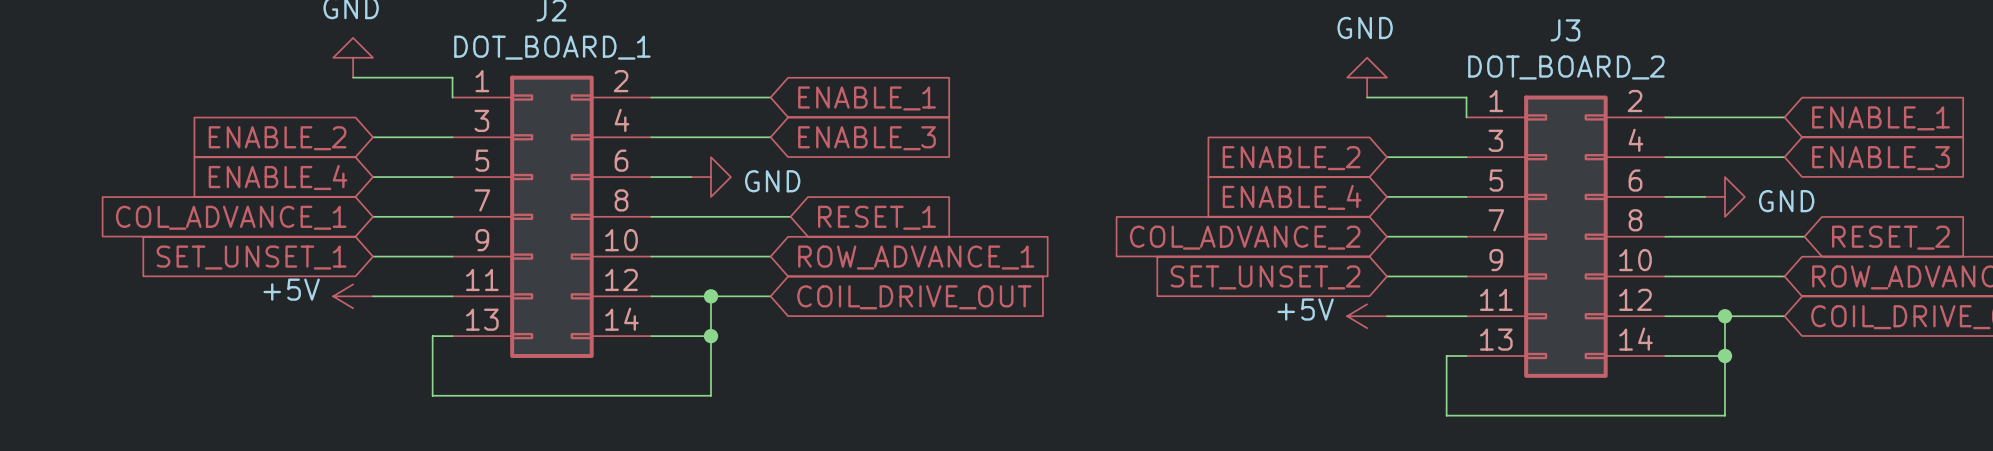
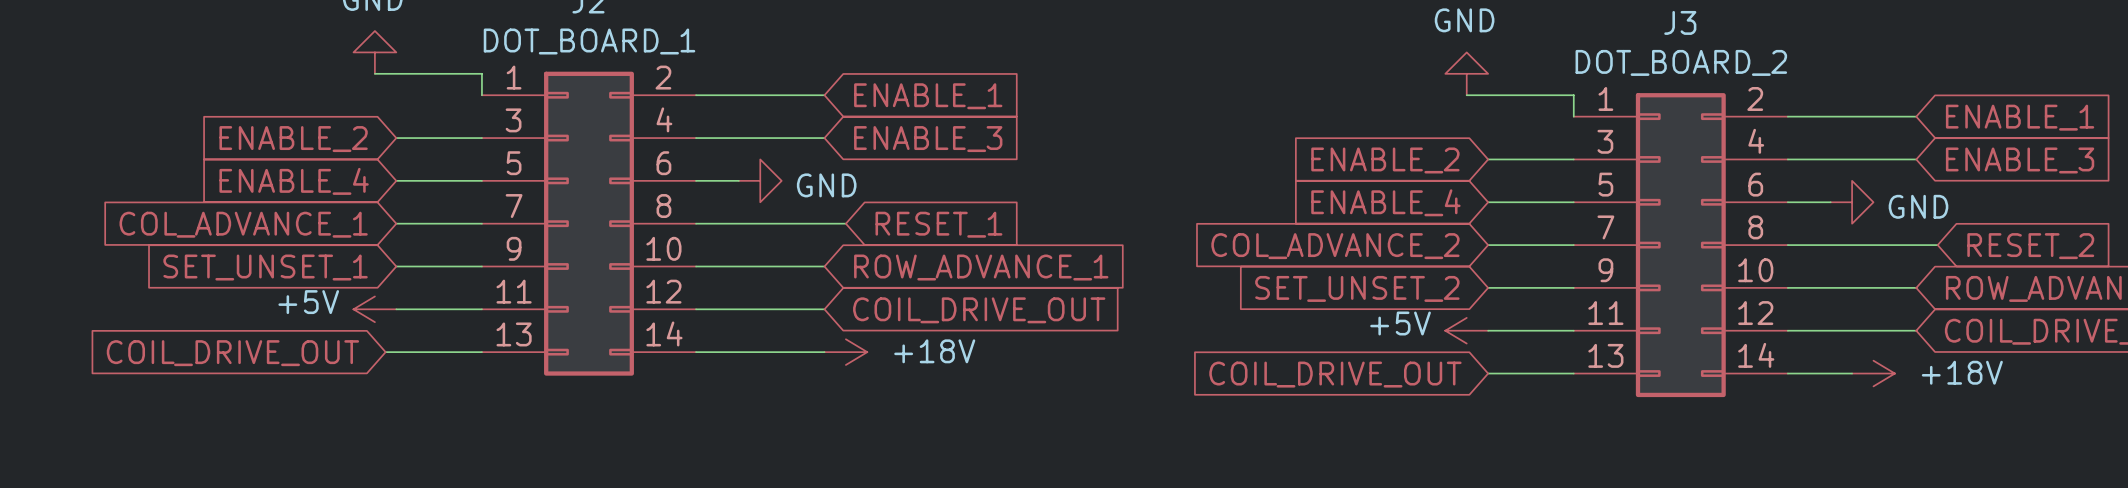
wire: (710, 296) (710, 395) (432, 395) (432, 336) -> (385, 352) (460, 352)
junction: (710, 296) -> none
wire: (1724, 316) (1724, 415) (1446, 415) (1446, 355) -> (1488, 373) (1552, 373)
junction: (1724, 316) -> none
wire: none -> (760, 352) (824, 352)
junction: (710, 336) -> none
power symbol: none -> +18V (845, 352)
global label: none -> COIL_DRIVE_OUT (232, 353)
junction: (1724, 355) -> none
power symbol: none -> +18V (1873, 373)
global label: none -> COIL_DRIVE_OUT (1335, 374)

